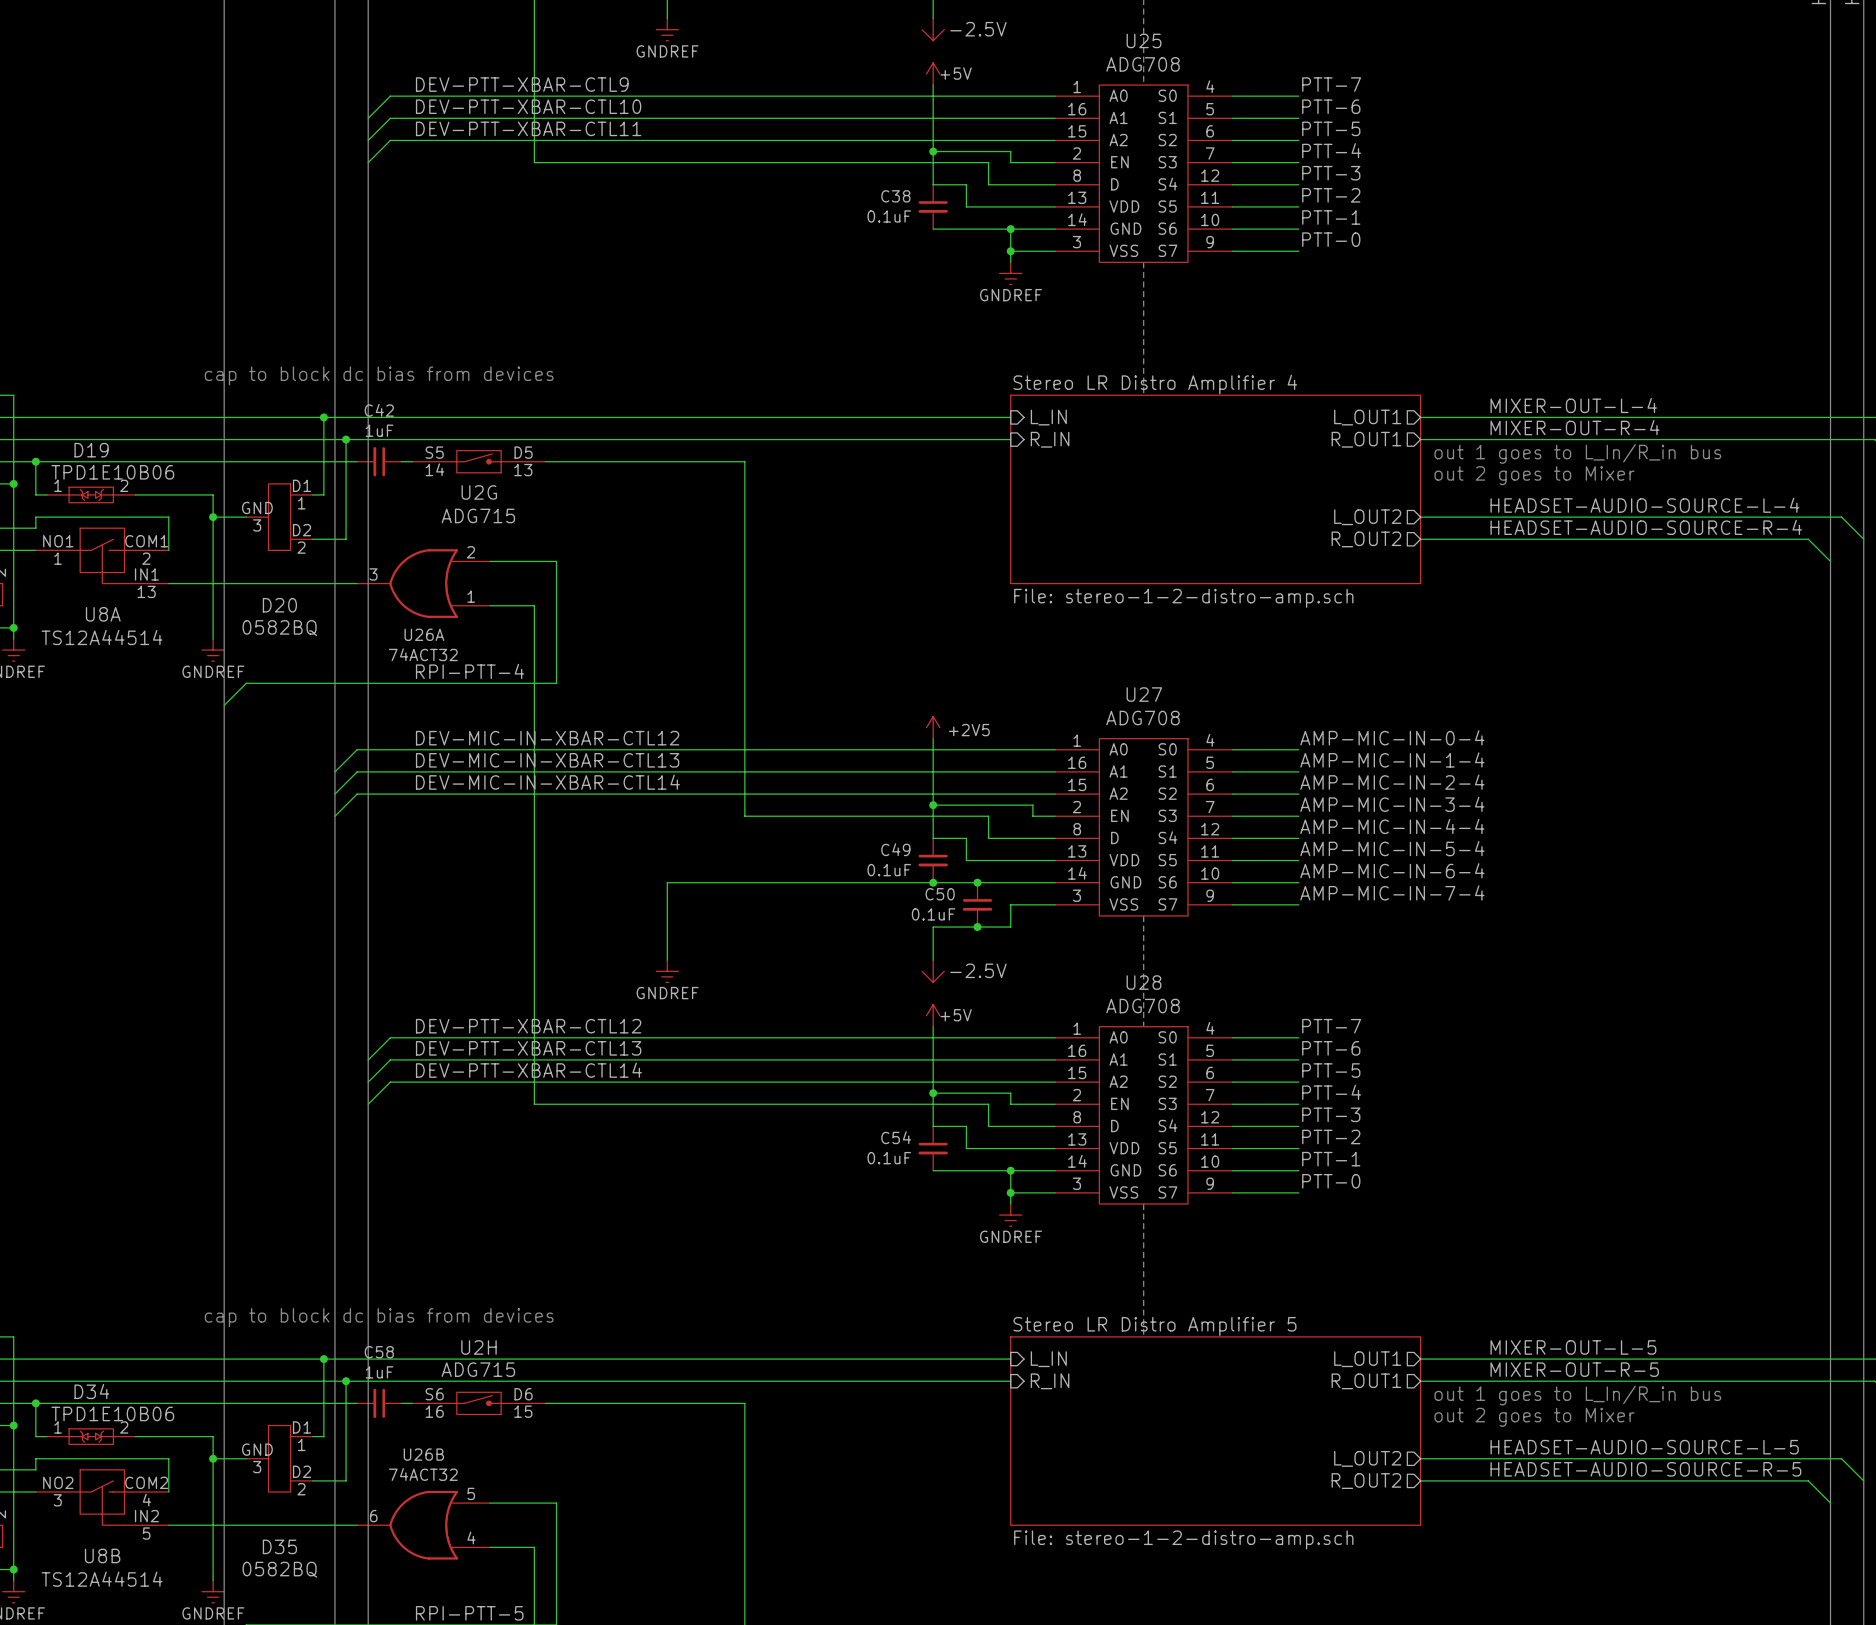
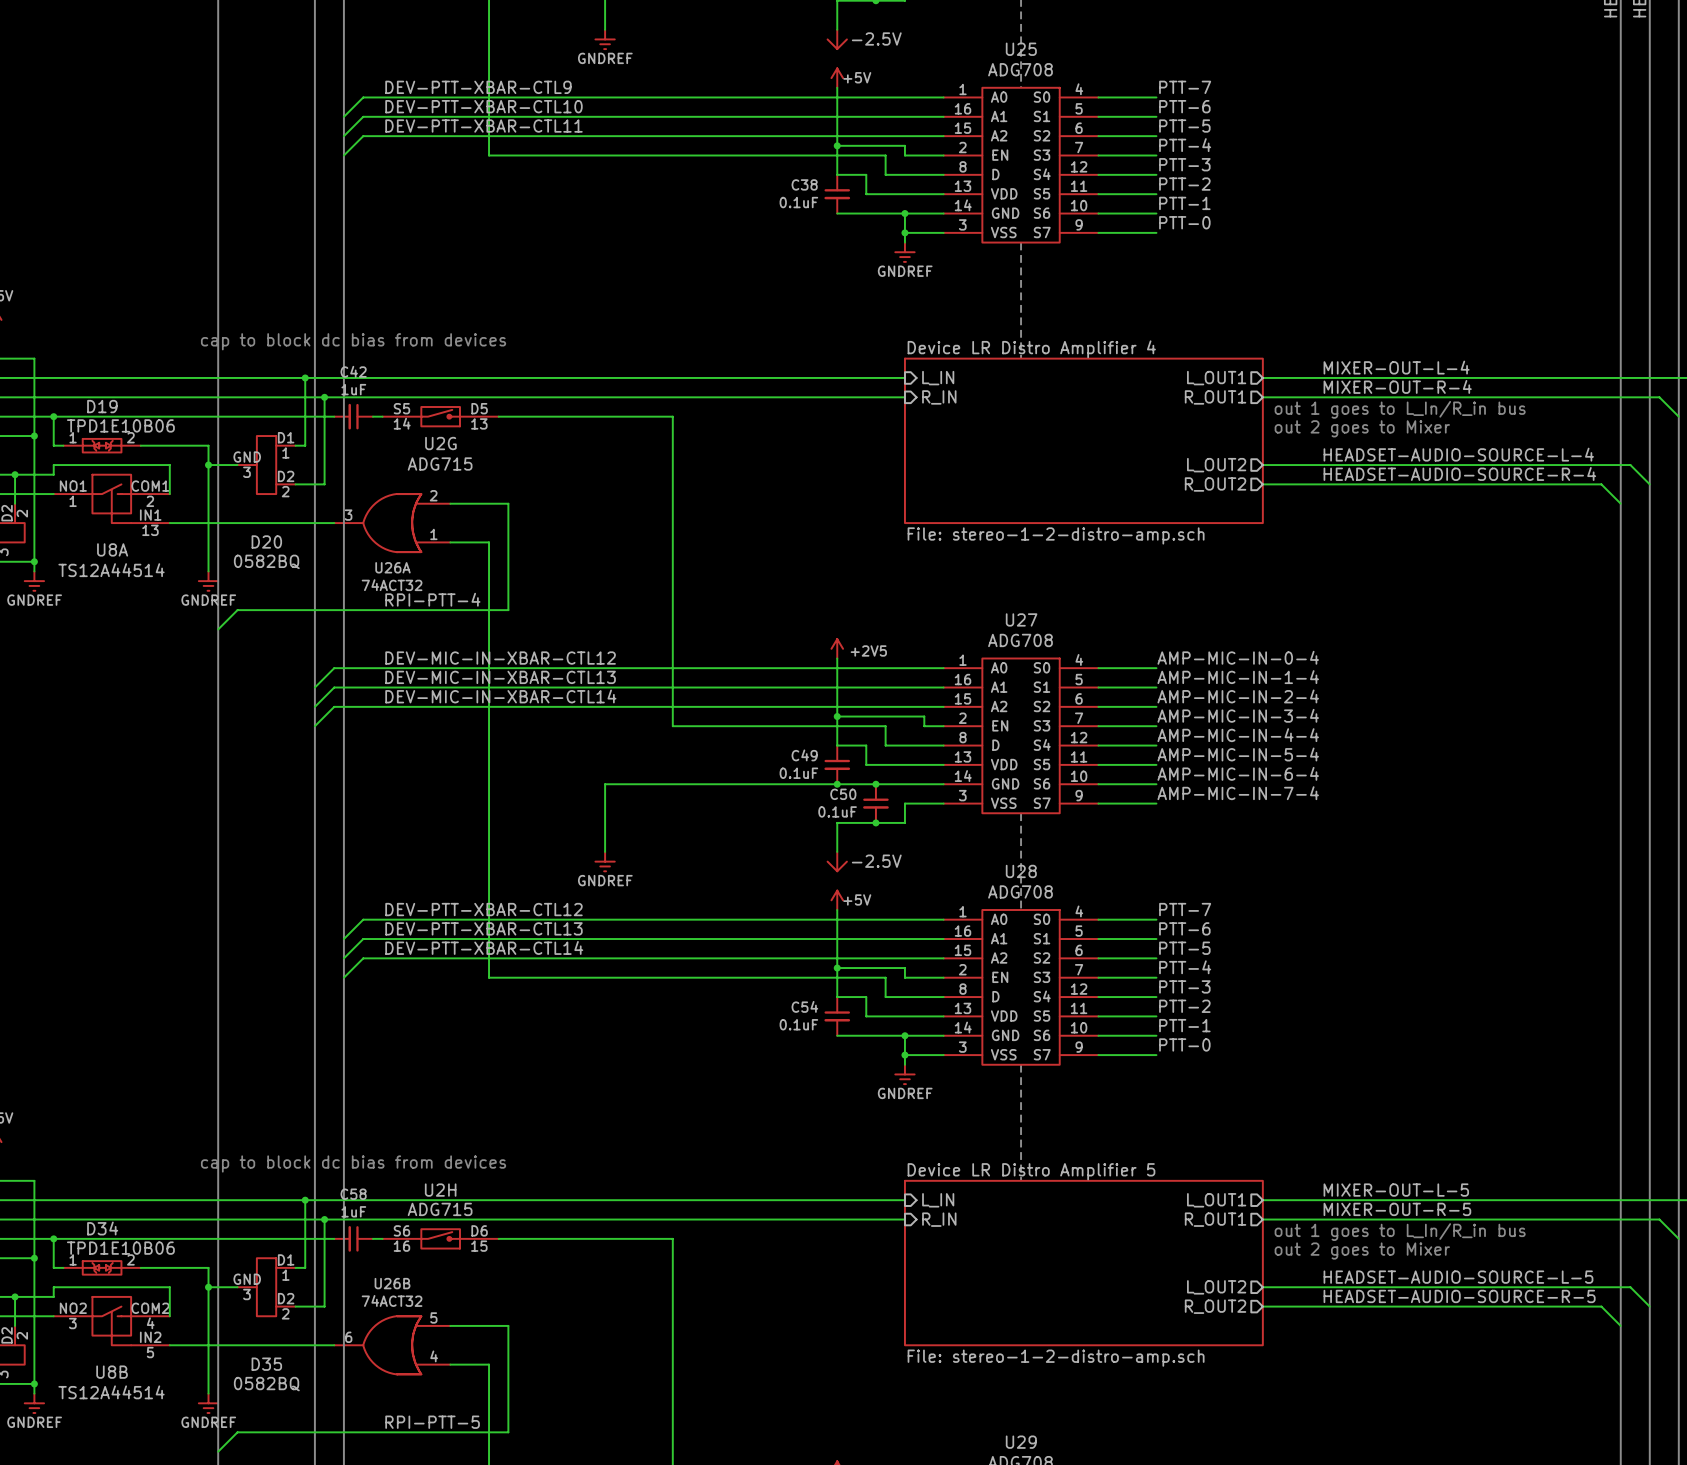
sheet Stereo LR Distro Amplifier 4 name: Stereo LR Distro Amplifier 4 (1155, 384) -> Device LR Distro Amplifier 4 (1031, 349)
sheet Stereo LR Distro Amplifier 5 name: Stereo LR Distro Amplifier 5 (1154, 1326) -> Device LR Distro Amplifier 5 (1031, 1171)

